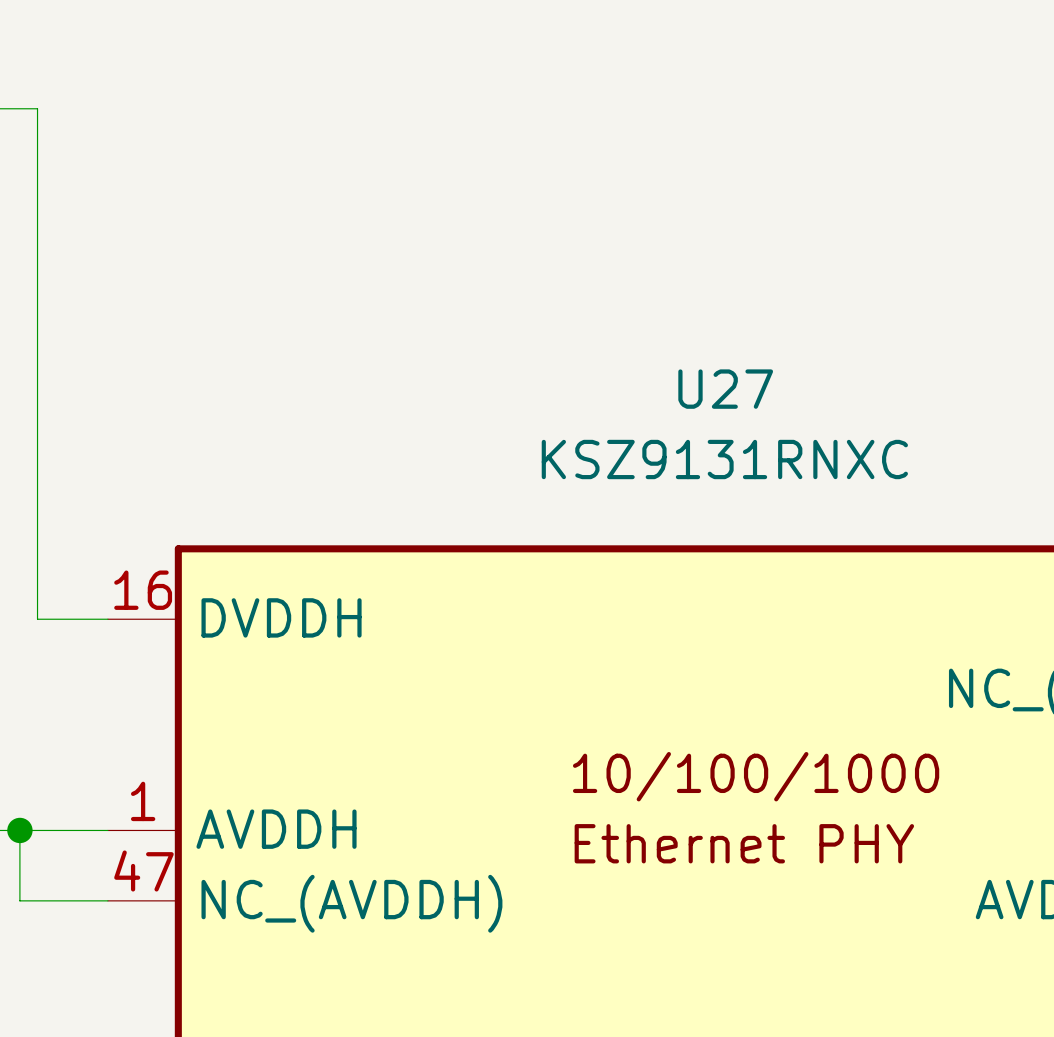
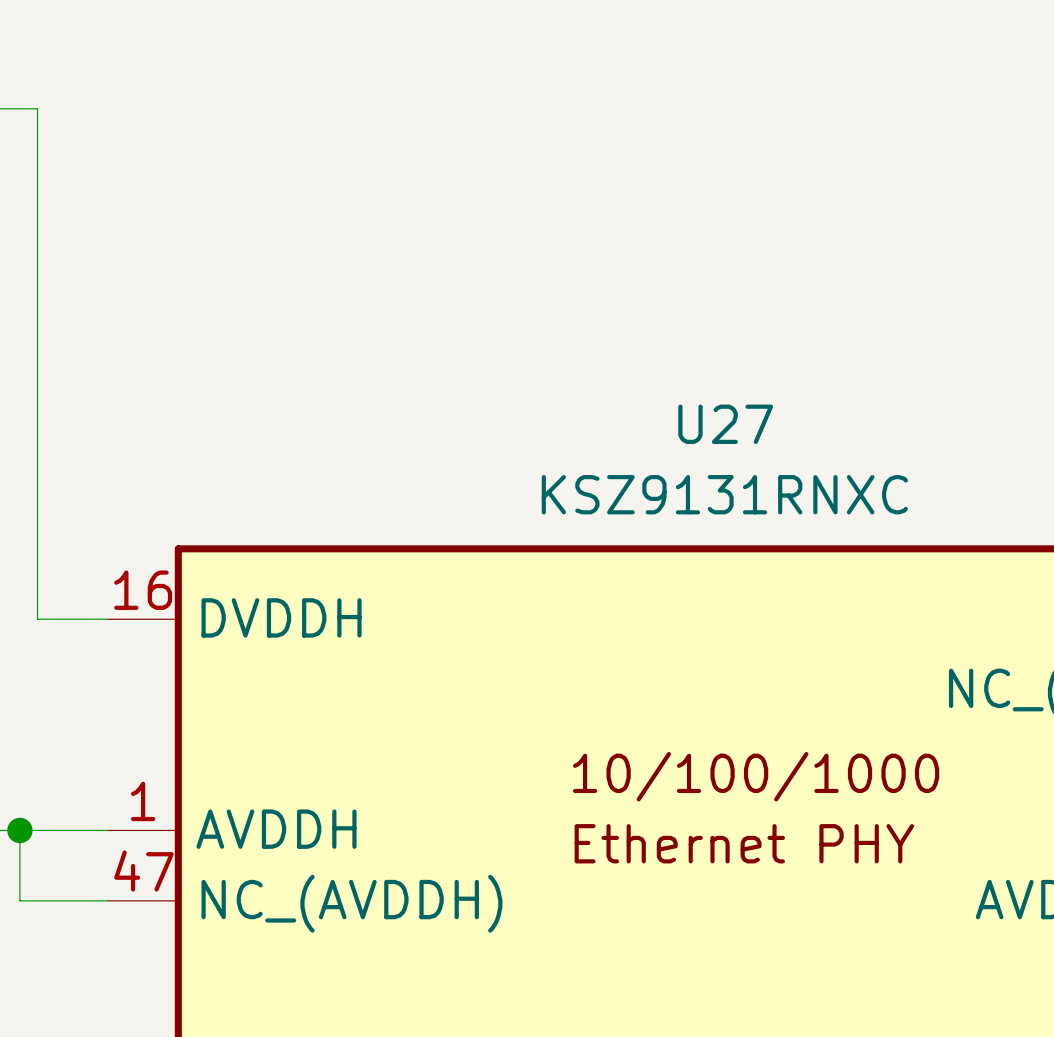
U27 name position: U27 (725, 389) -> U27 (725, 424)
U27 value position: KSZ9131RNXC (724, 459) -> KSZ9131RNXC (724, 494)

